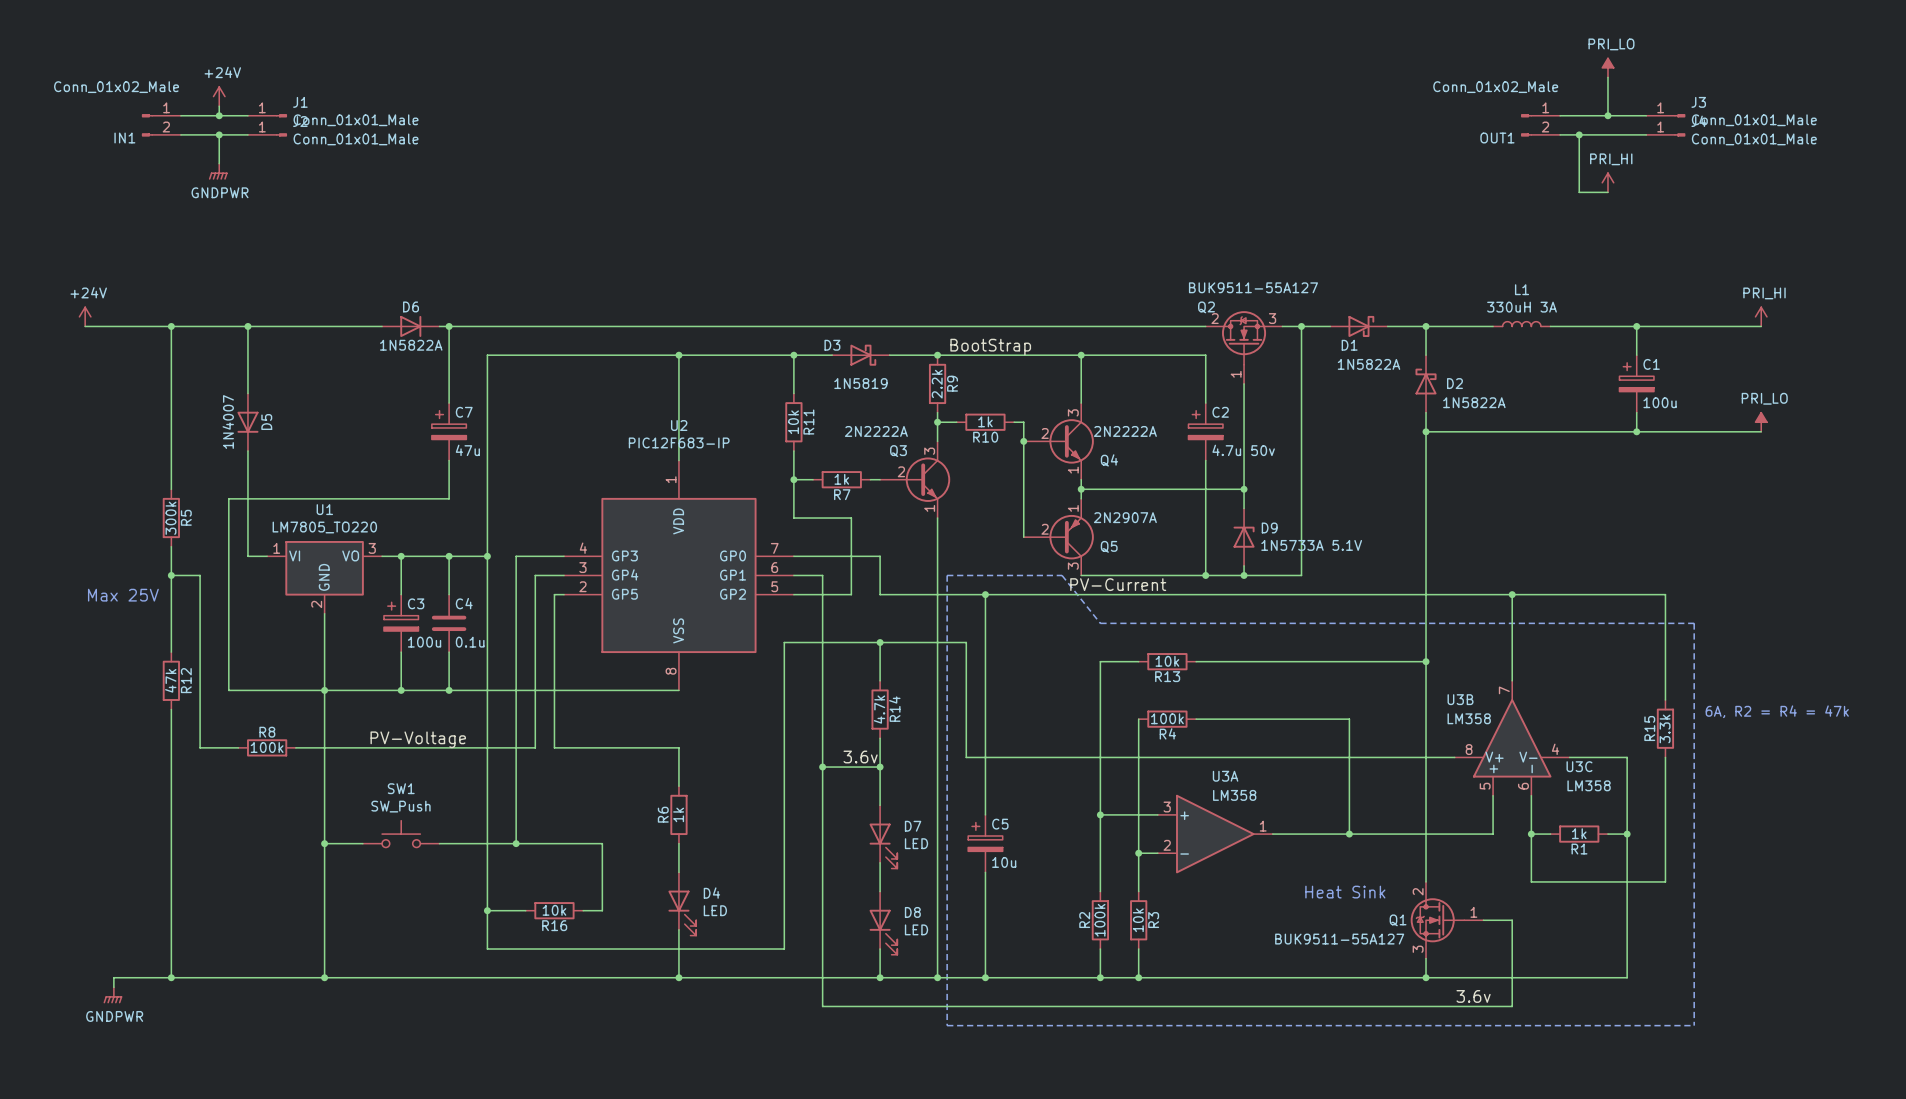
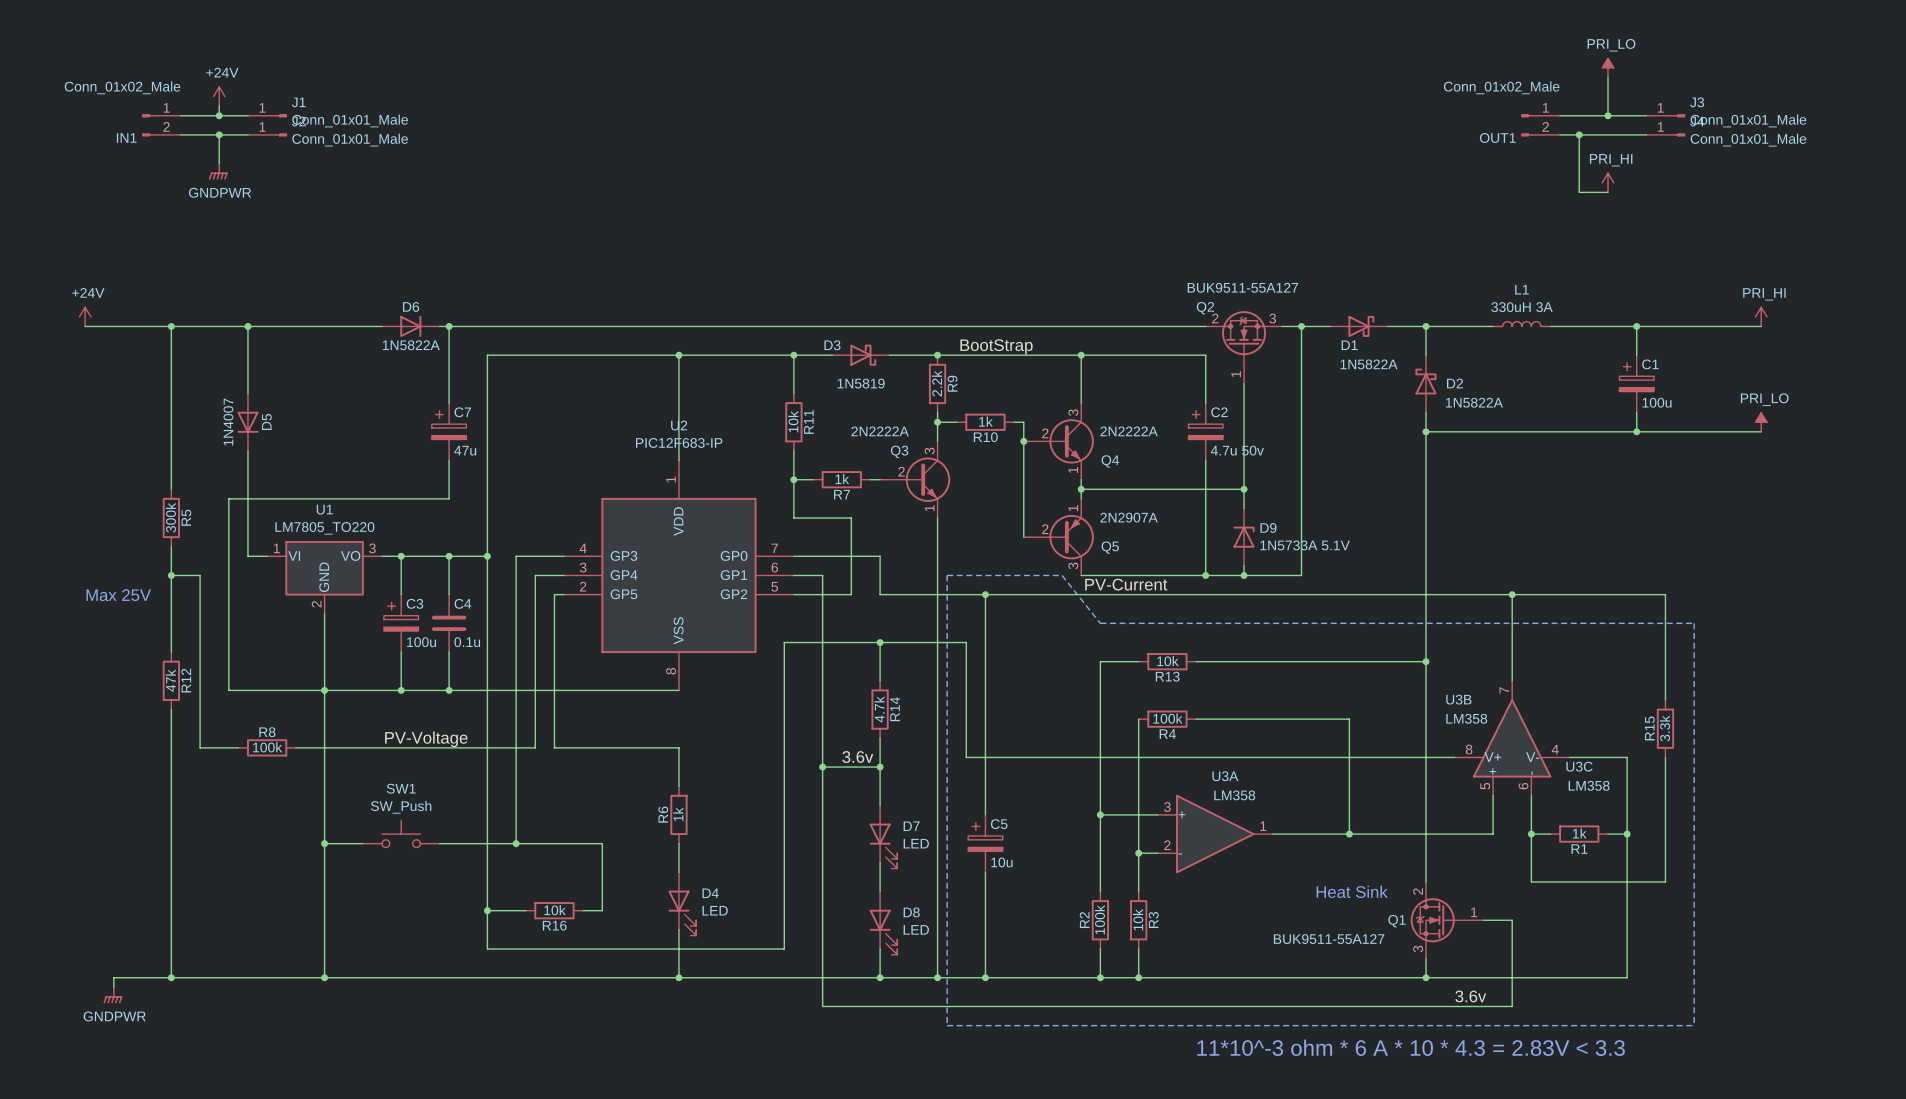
text: 6A, R2 = R4 = 47k (1777, 711) -> none
text: none -> 11*10^-3 ohm * 6 A * 10 * 4.3 = 2.83V < 3.3 (1411, 1047)

